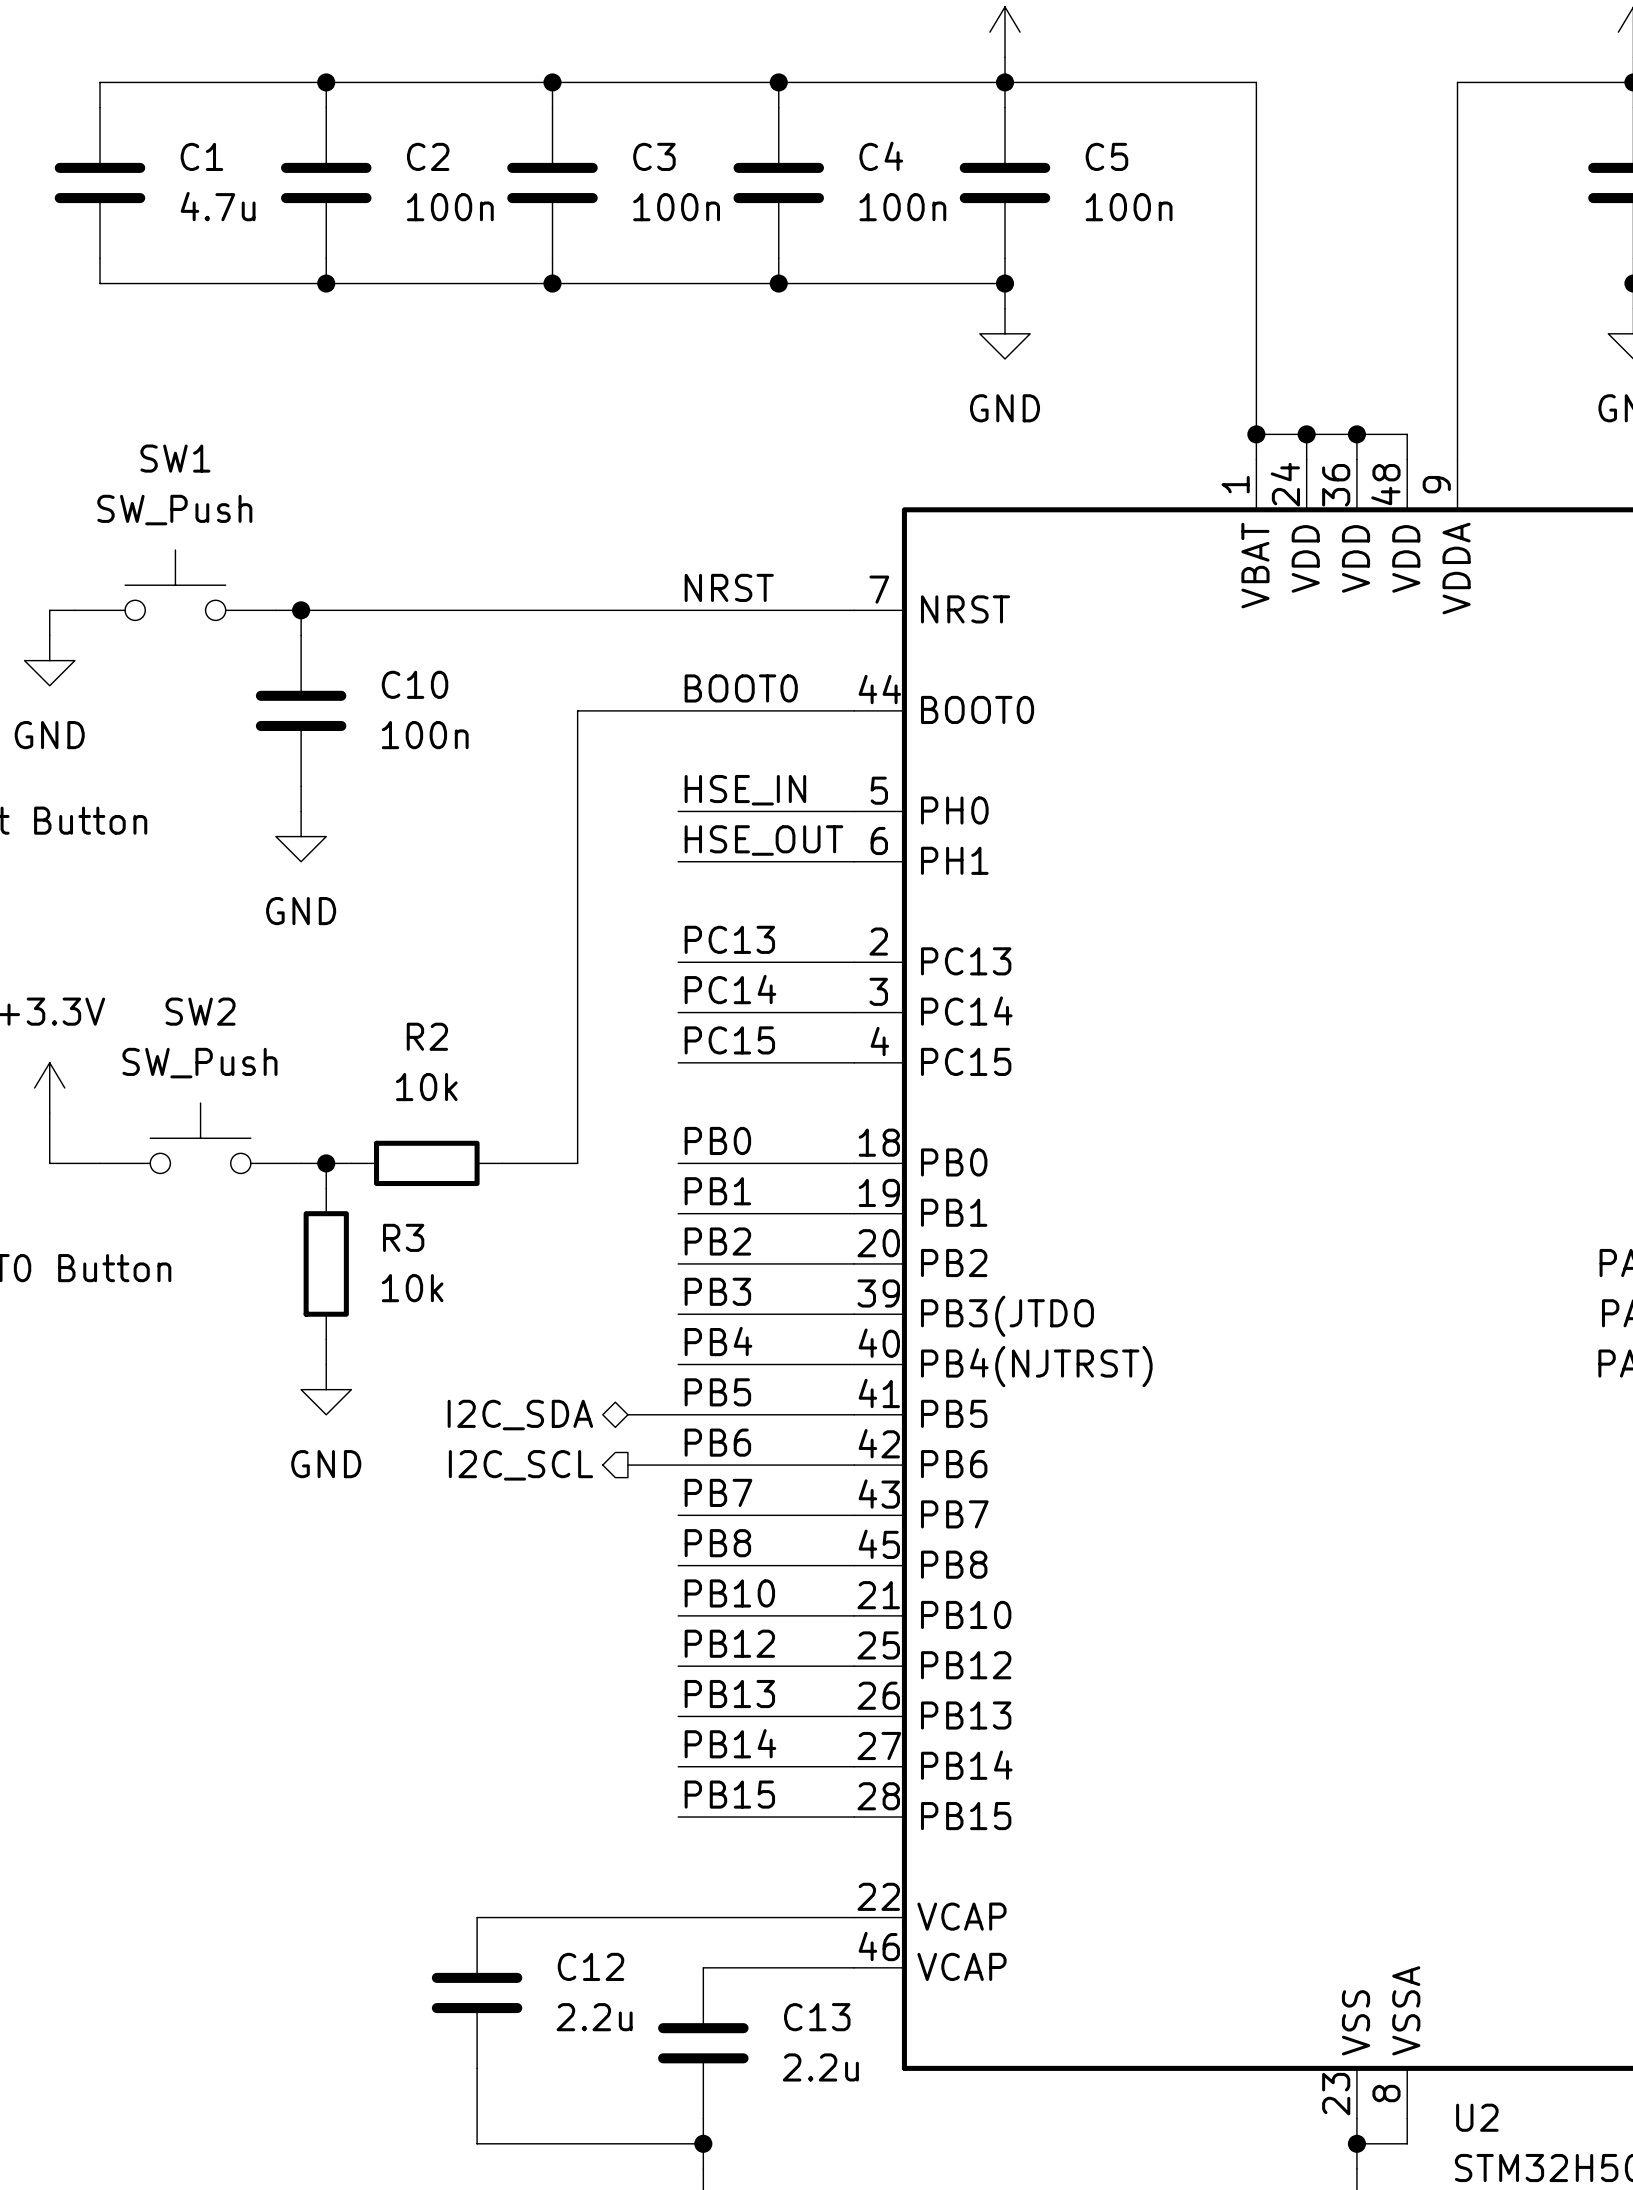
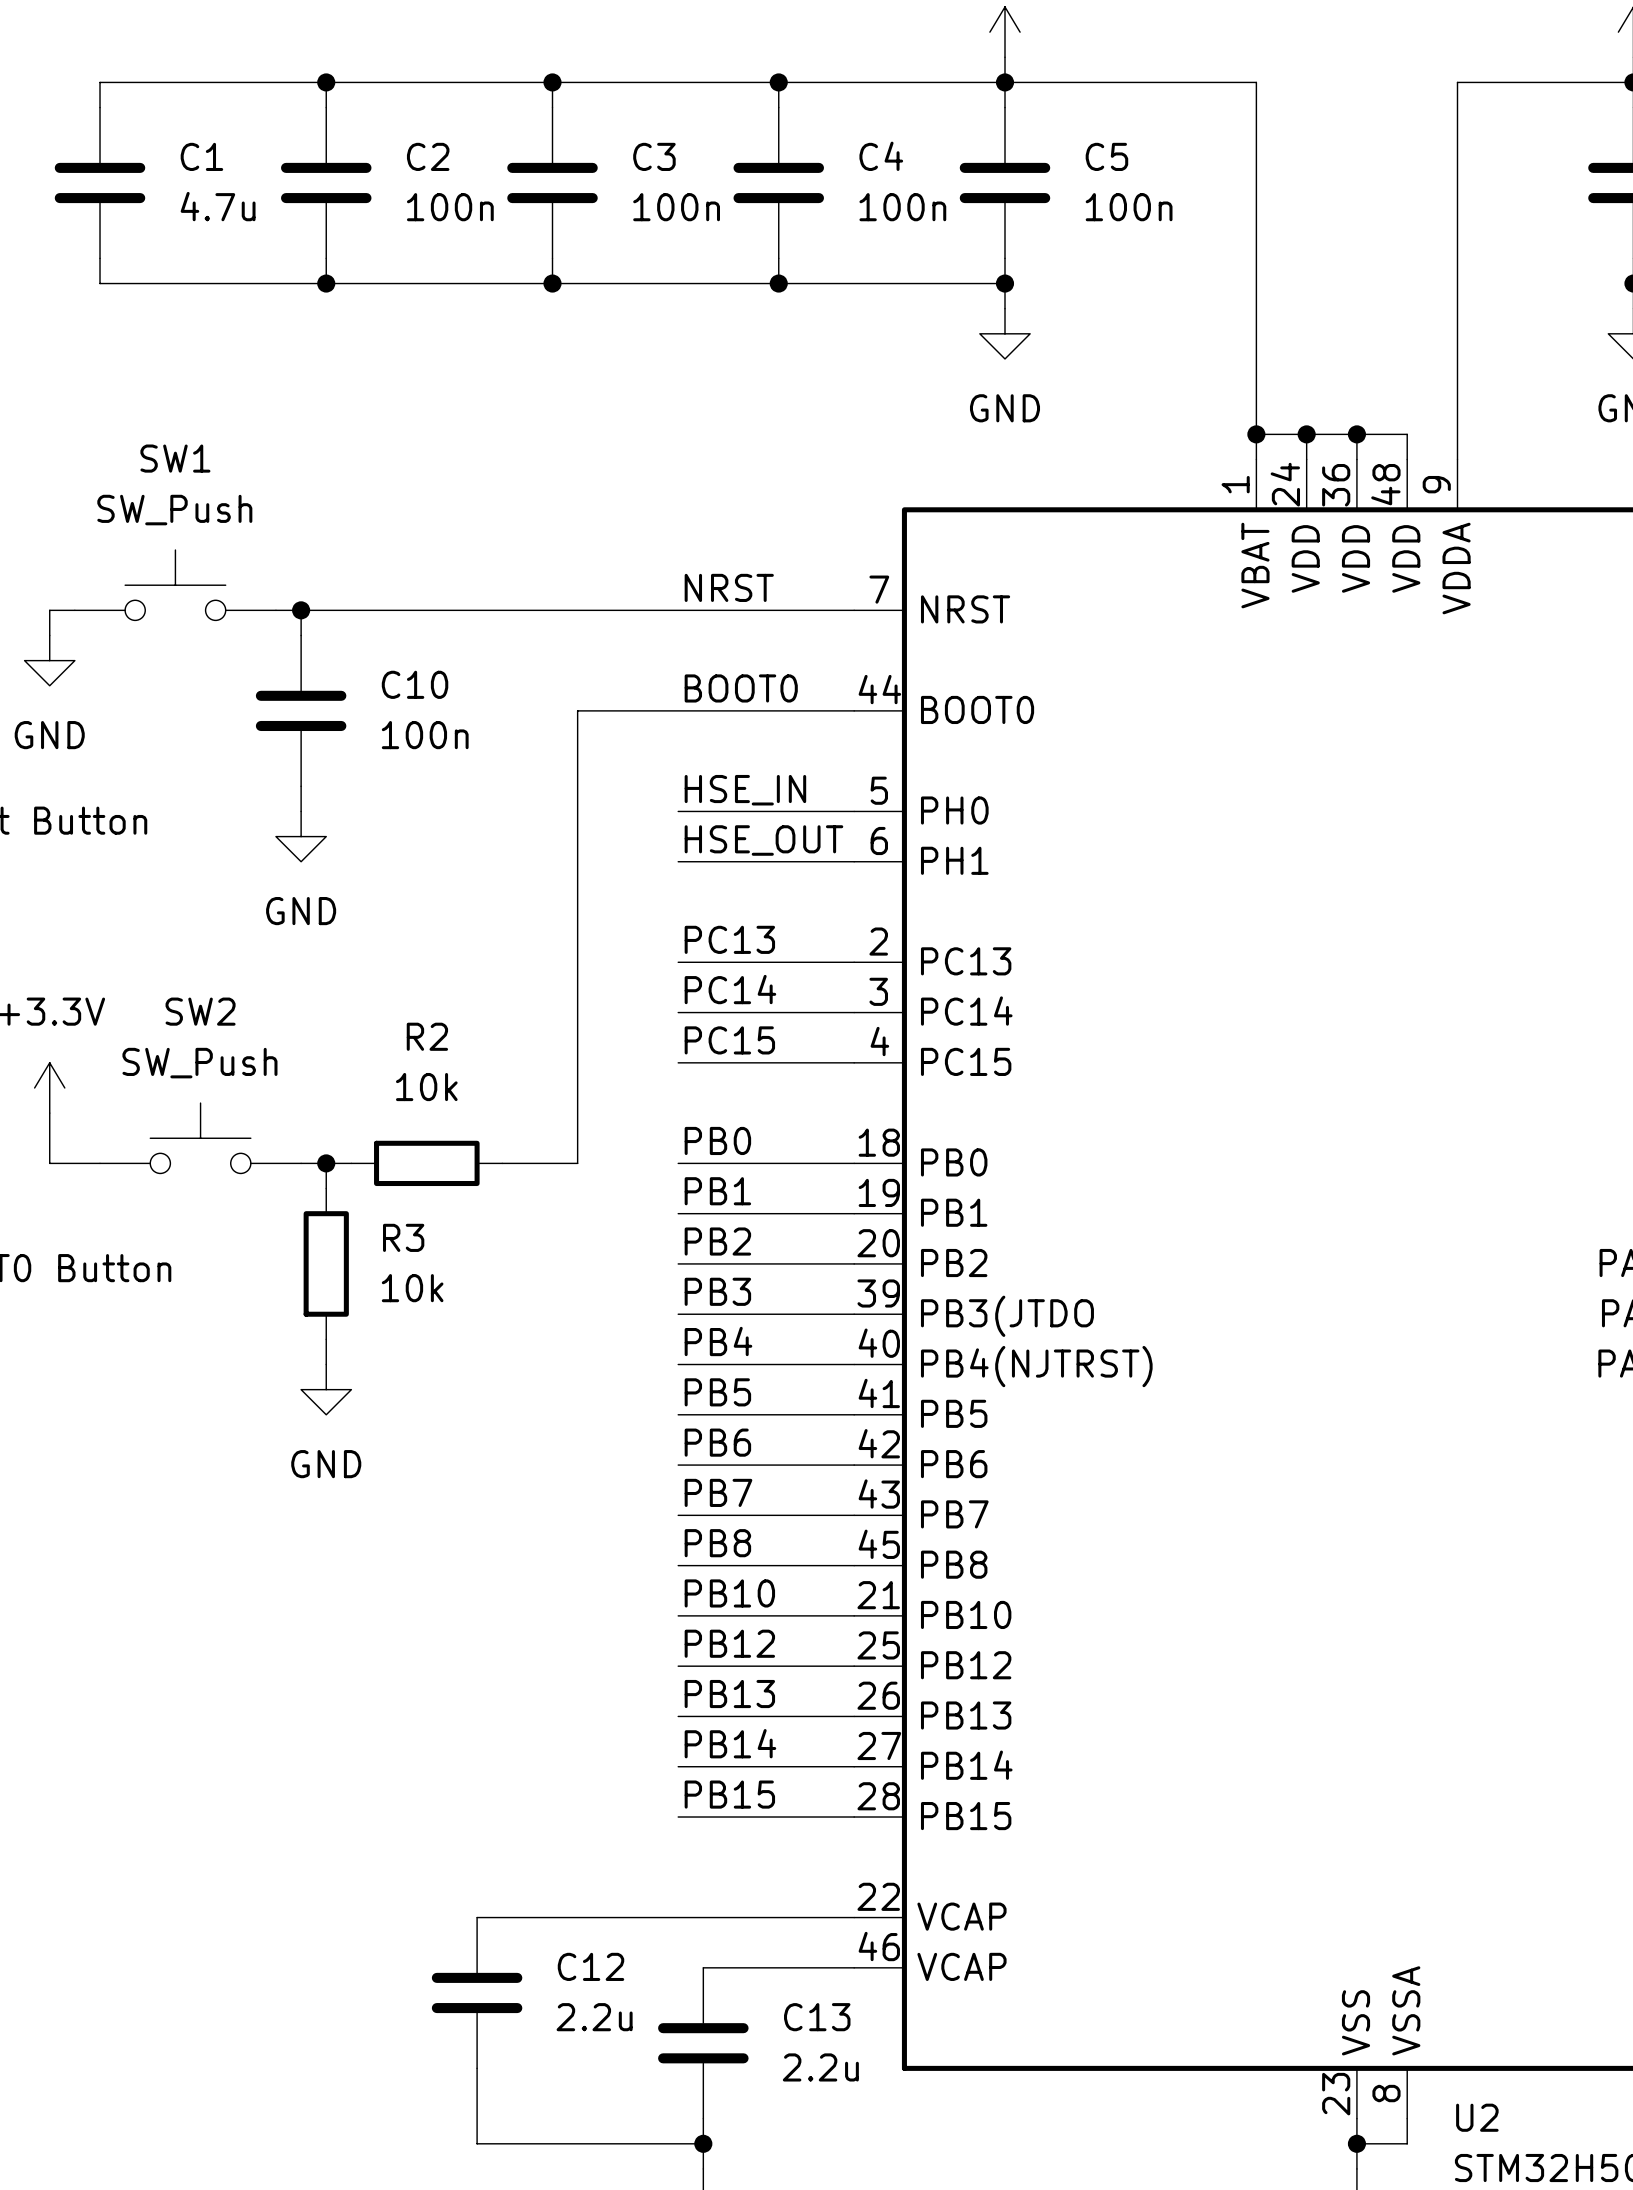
wire: (627, 1414) (678, 1414) -> none
hierarchical label: I2C_SDA (520, 1415) -> none
hierarchical label: I2C_SCL (520, 1465) -> none
wire: (627, 1465) (678, 1465) -> none

